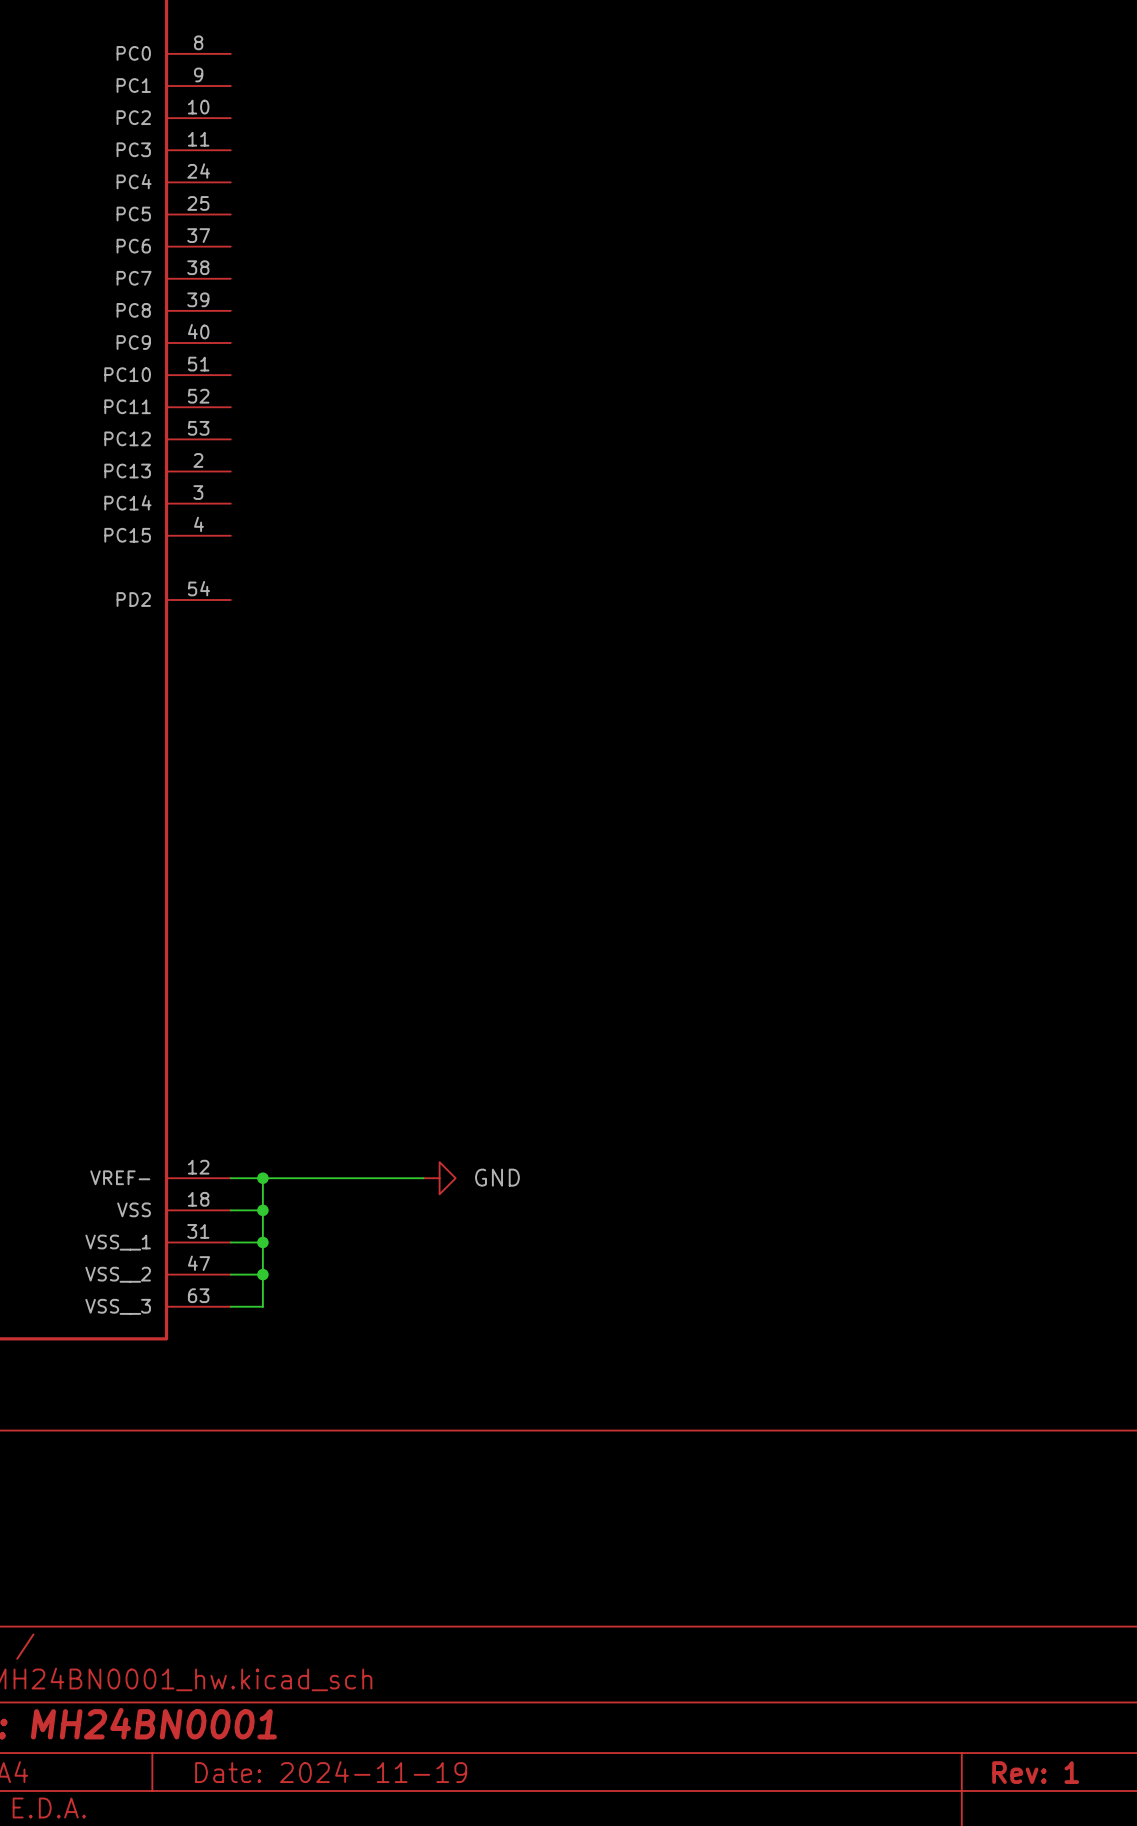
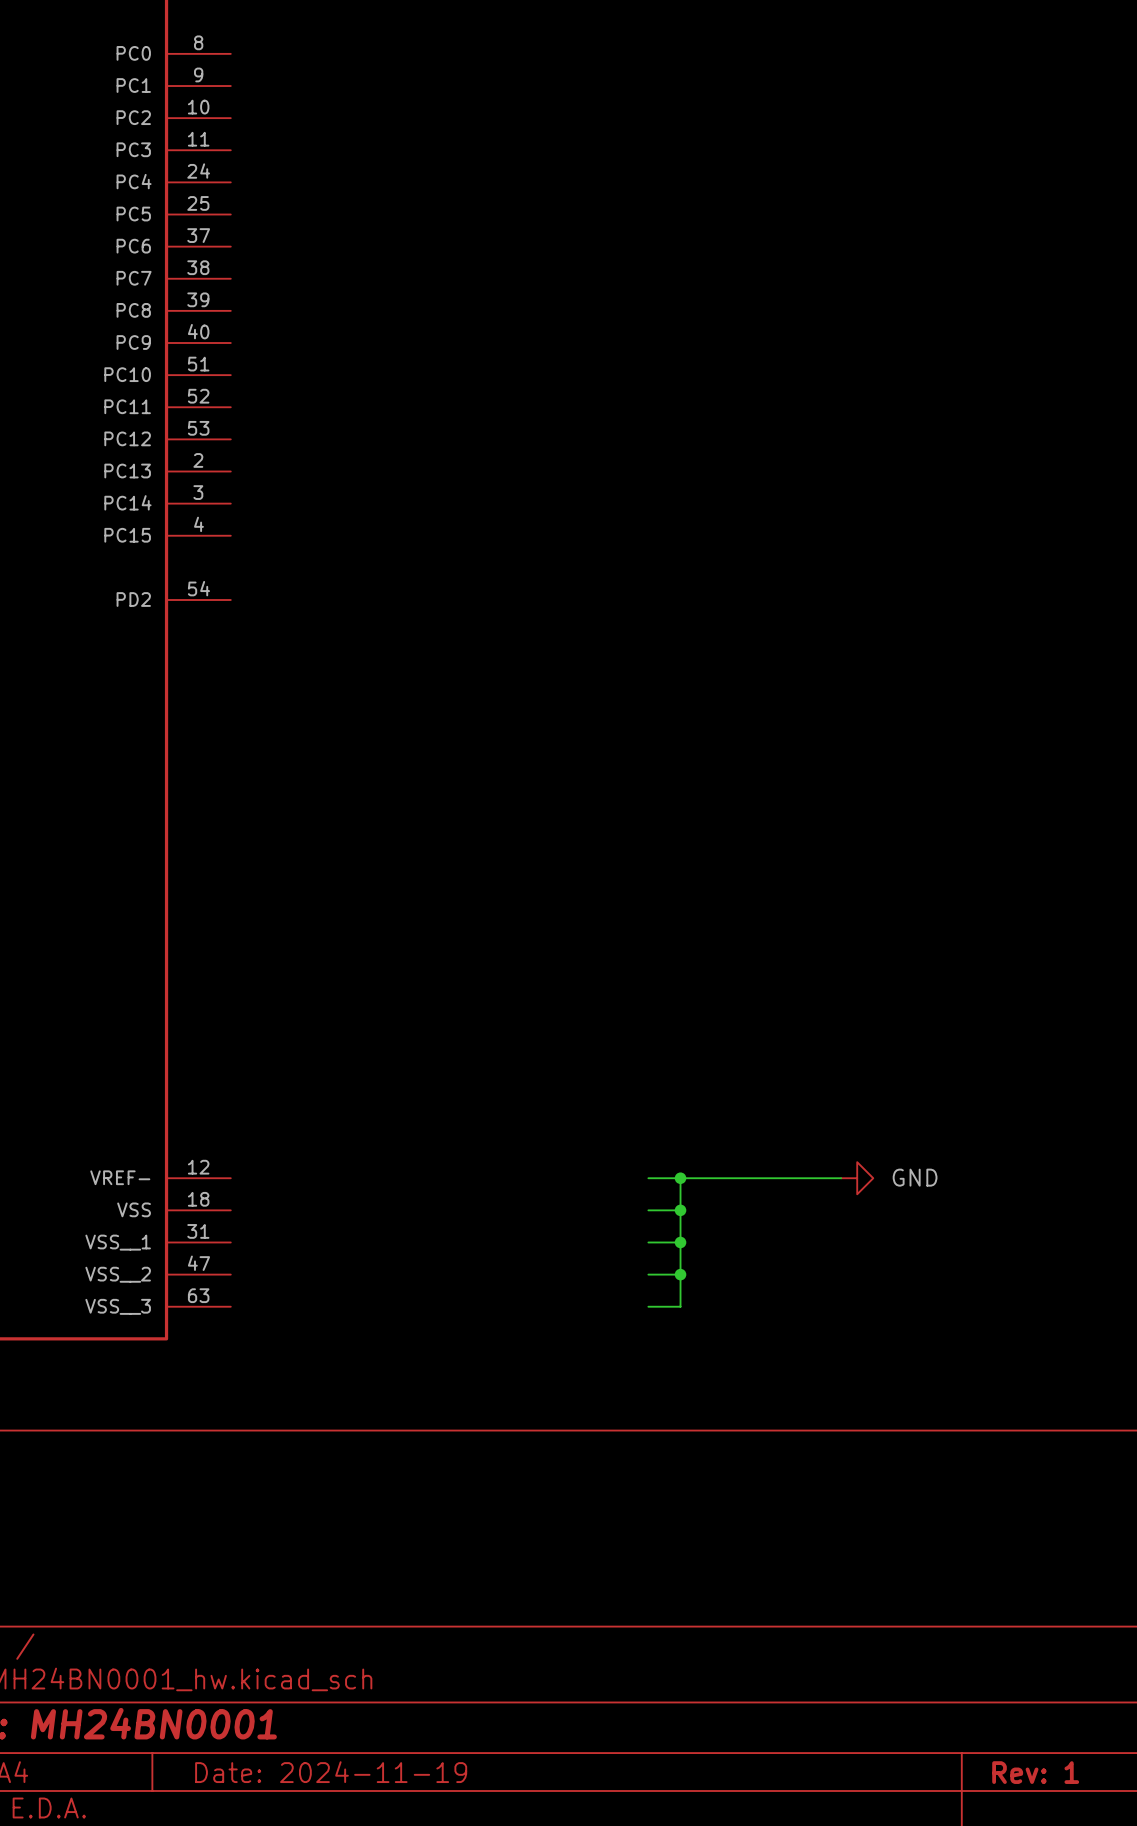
wire: (230, 1178) (423, 1178) -> none
wire: (262, 1178) (262, 1306) (230, 1306) -> none
junction: (262, 1178) -> none
power symbol: GND (439, 1178) -> none
wire: none -> (648, 1178) (841, 1178)
wire: none -> (680, 1178) (680, 1306) (648, 1306)
junction: none -> (680, 1178)
power symbol: none -> GND (857, 1178)
wire: (230, 1210) (262, 1210) -> none
junction: (262, 1210) -> none
wire: none -> (648, 1210) (680, 1210)
junction: none -> (680, 1210)
wire: (230, 1242) (262, 1242) -> none
junction: (262, 1242) -> none
wire: none -> (648, 1242) (680, 1242)
junction: none -> (680, 1242)
wire: (230, 1274) (262, 1274) -> none
junction: (262, 1274) -> none
wire: none -> (648, 1274) (680, 1274)
junction: none -> (680, 1274)

